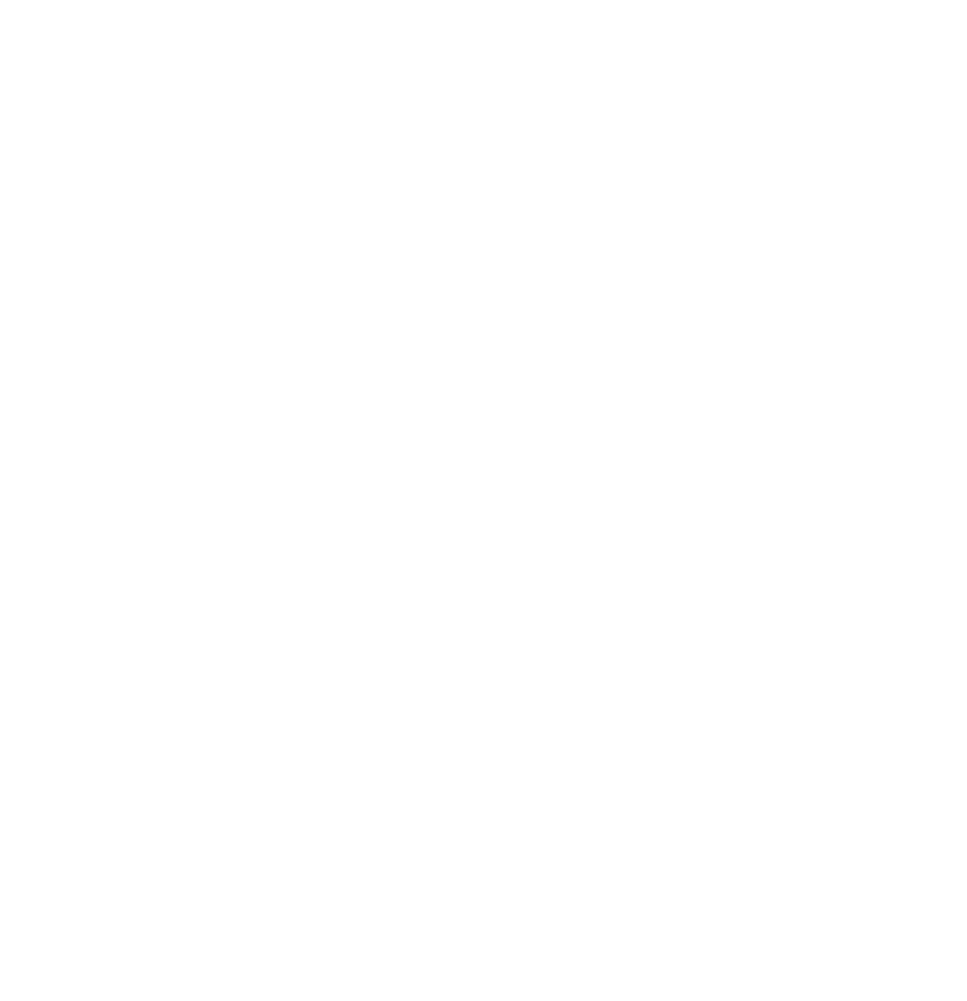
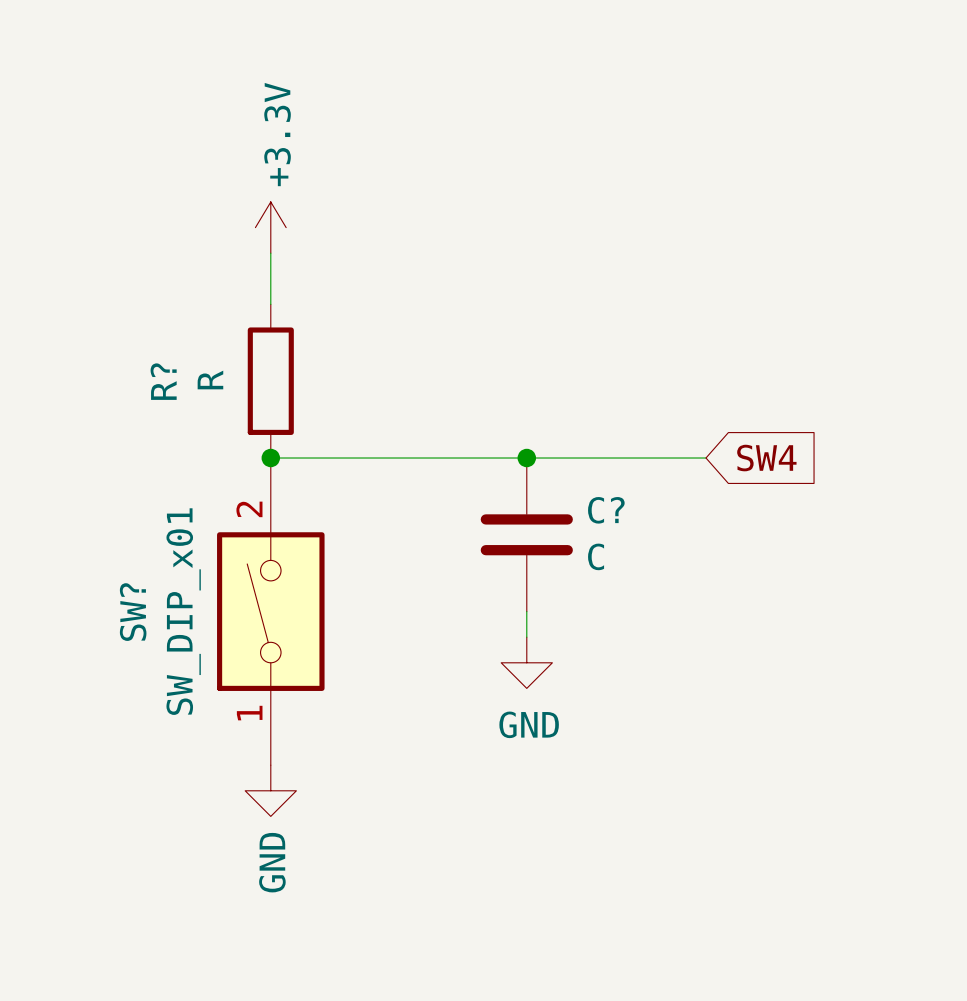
power symbol: none -> +3.3V (270, 227)
wire: none -> (270, 253) (270, 304)
R?: none -> R (270, 381)
global label: none -> SW4 (766, 458)
wire: none -> (270, 458) (705, 458)
junction: none -> (270, 458)
junction: none -> (526, 458)
C?: none -> C (526, 534)
SW?: none -> SW_DIP_x01 (270, 611)
wire: none -> (526, 611) (526, 637)
power symbol: none -> GND (526, 662)
power symbol: none -> GND (270, 790)

